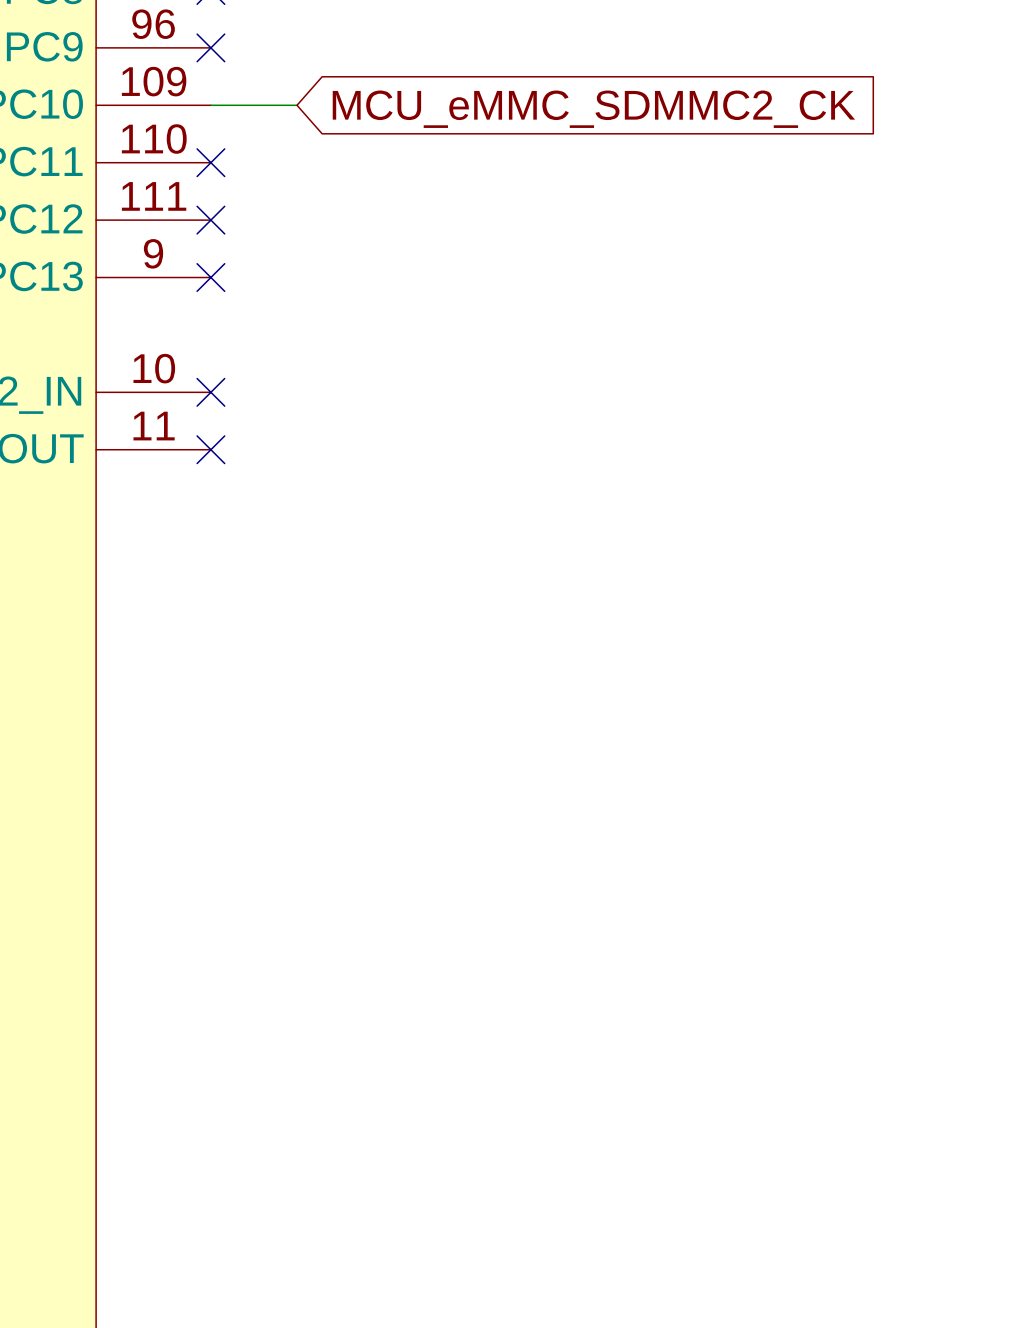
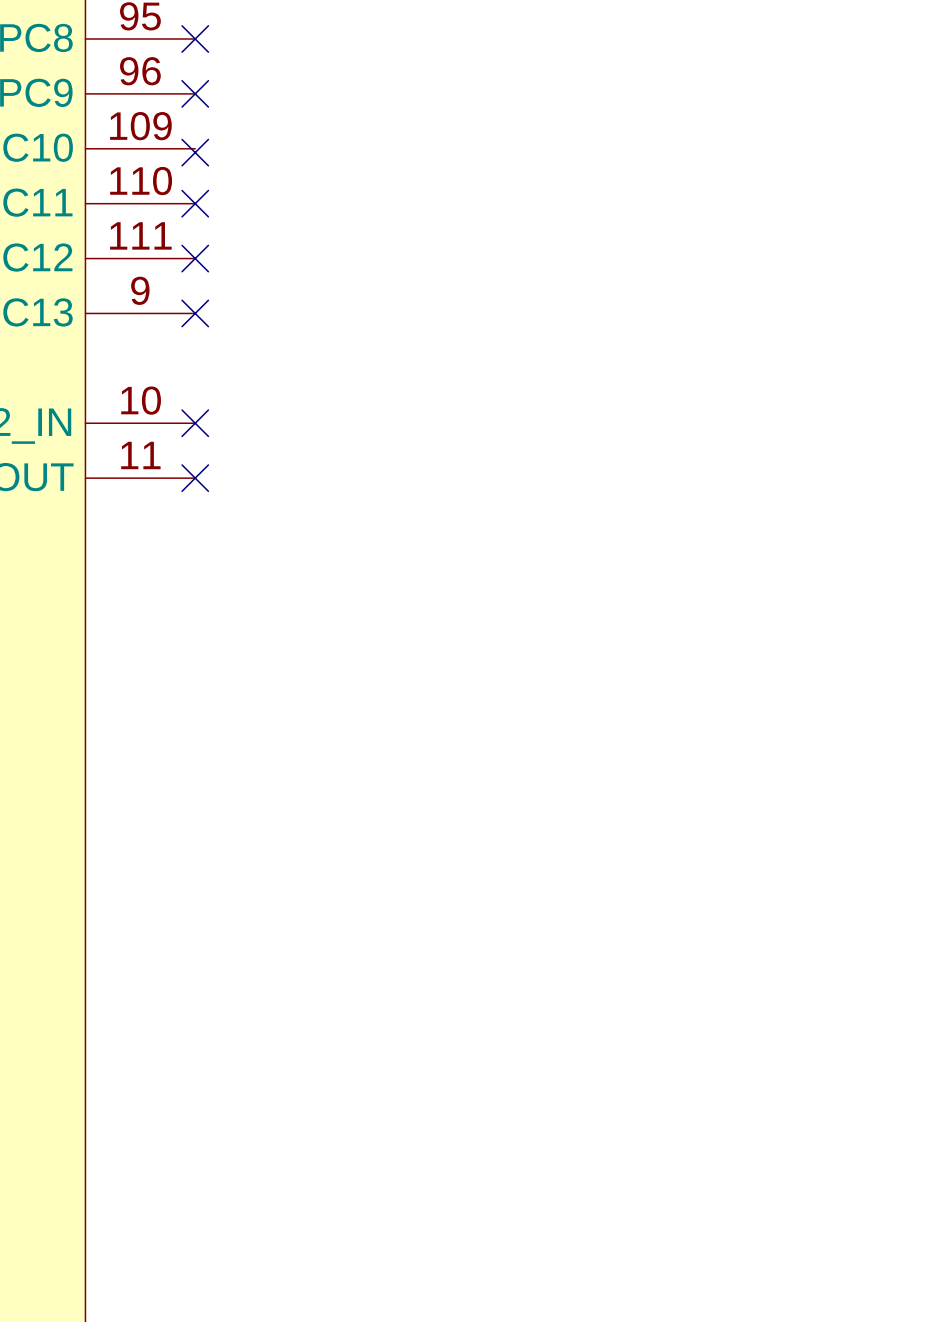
wire: (210, 105) (297, 105) -> none
no-connect mark: none -> (195, 152)
global label: MCU_eMMC_SDMMC2_CK (593, 109) -> none

